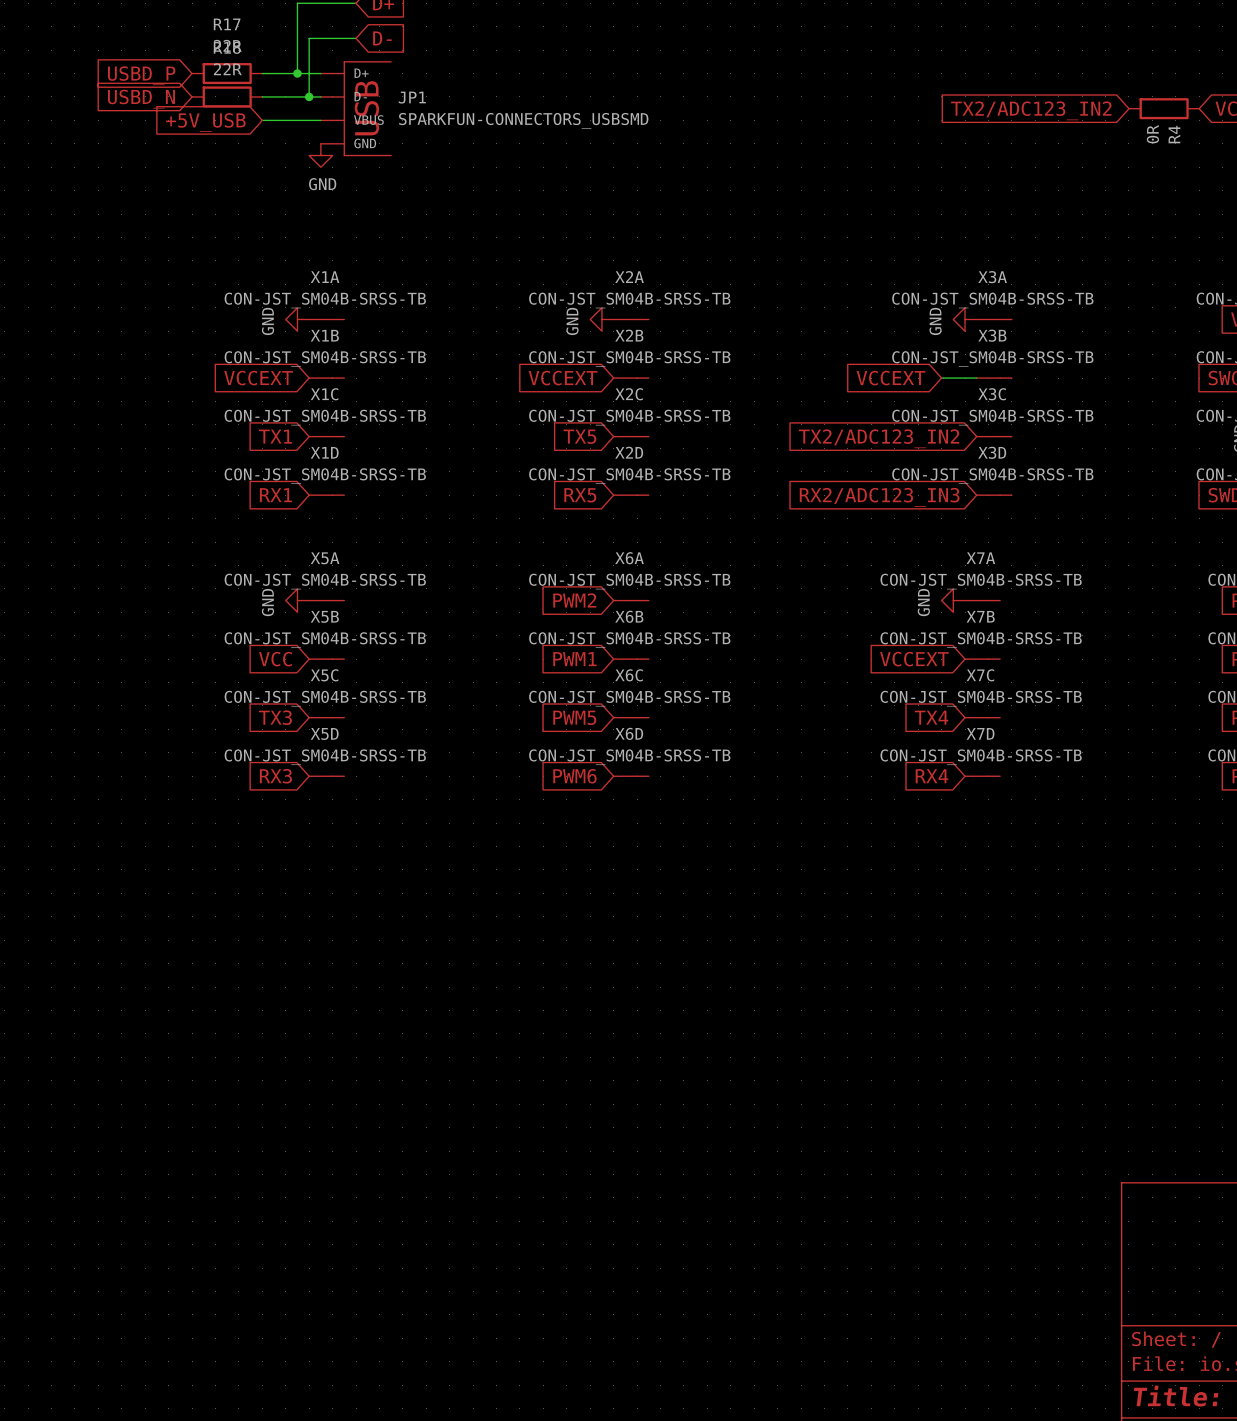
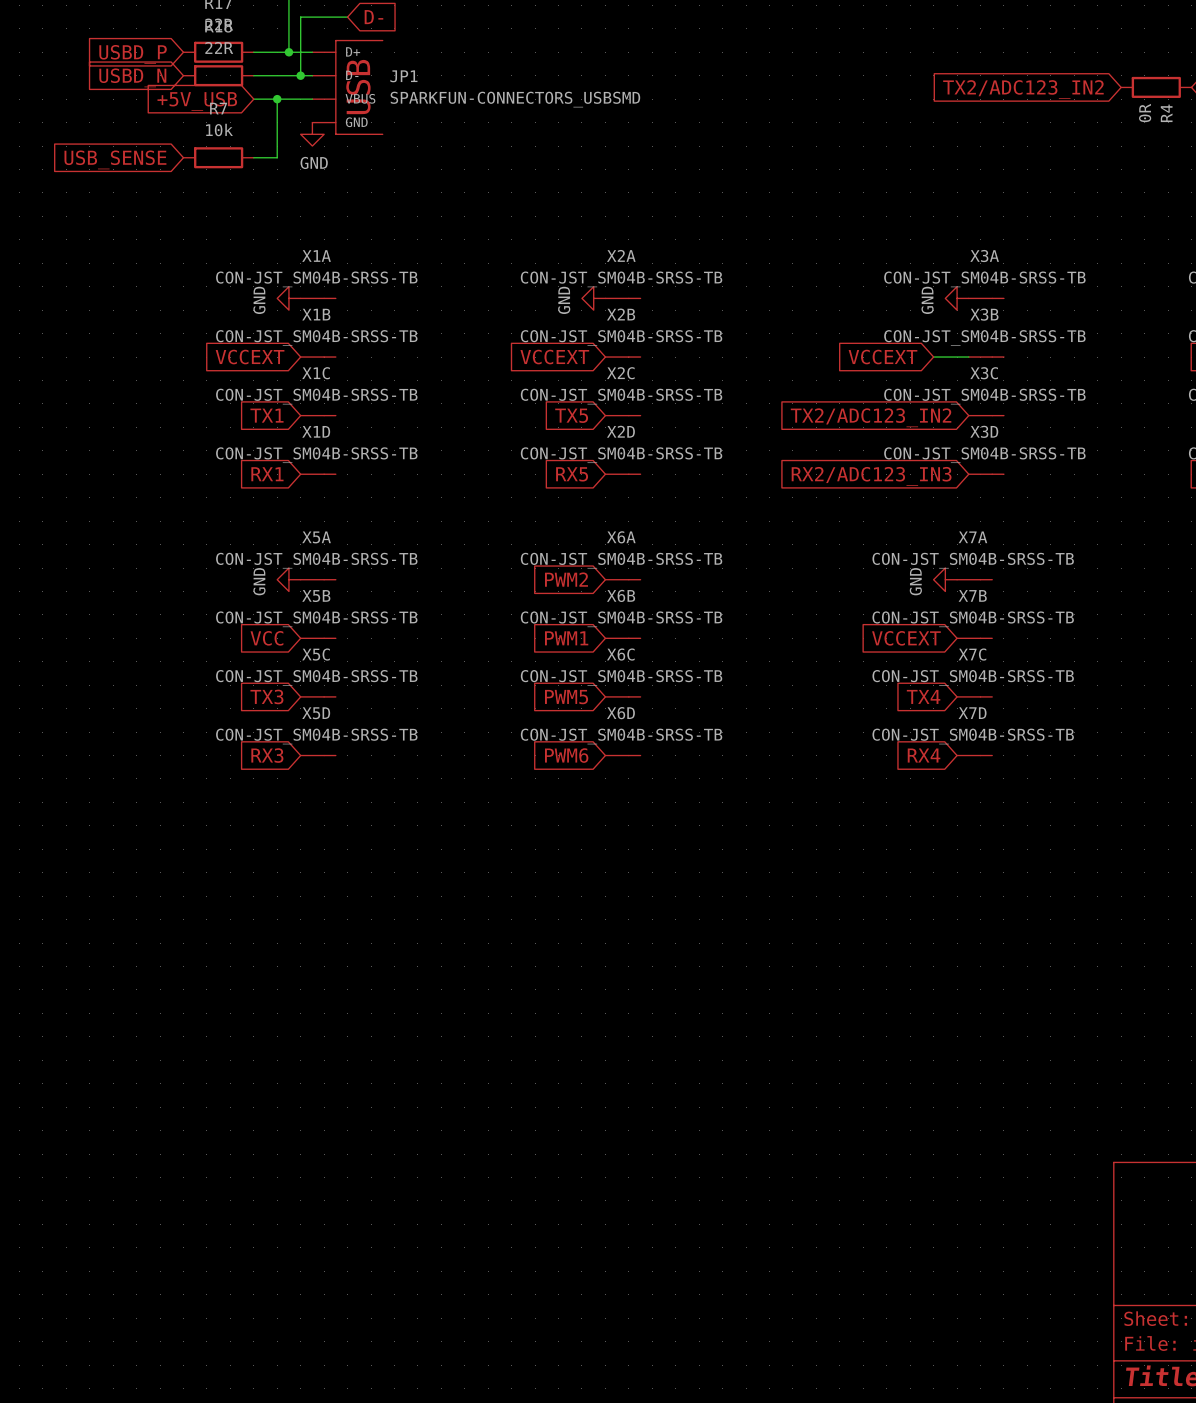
wire: none -> (277, 99) (277, 157) (253, 157)
junction: none -> (277, 99)
R7: none -> 10k (218, 157)
global label: none -> USB_SENSE (115, 159)

